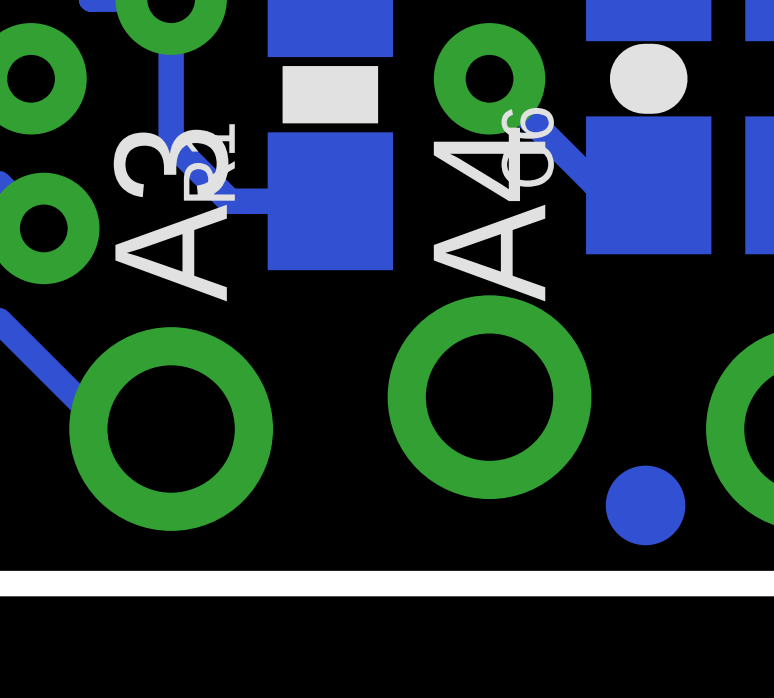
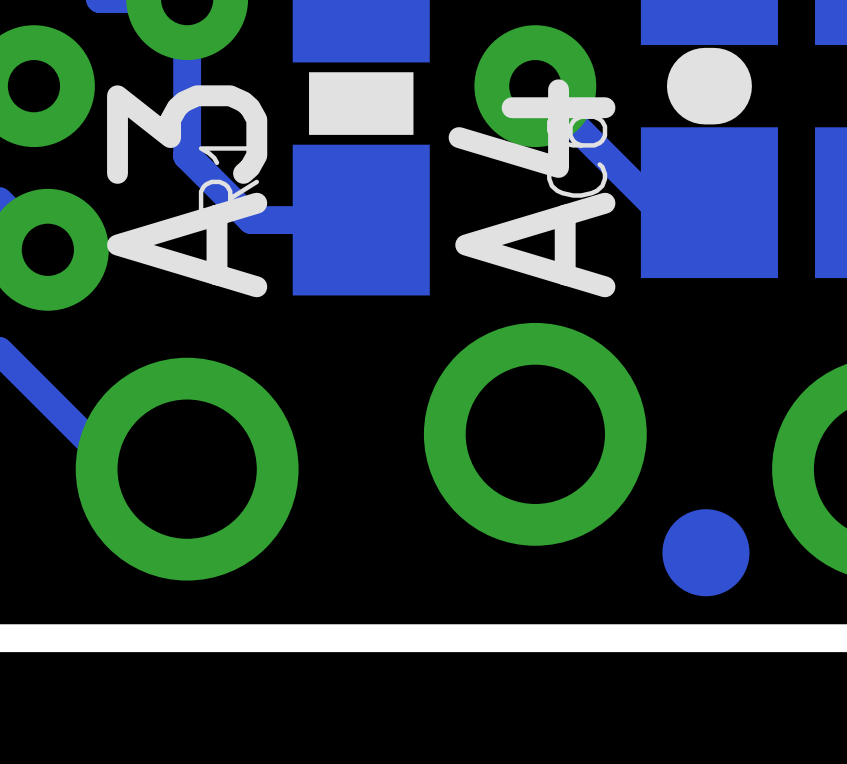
text position: A4 (489, 214) -> A4 (532, 188)
text position: A3 (171, 215) -> A3 (187, 191)

